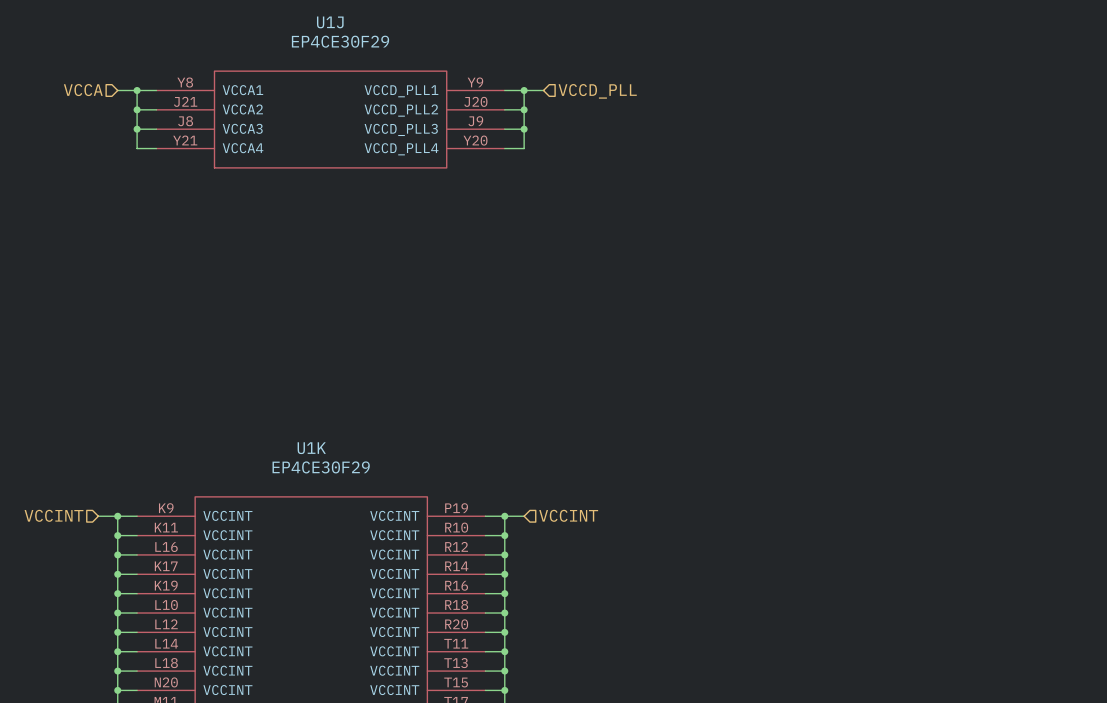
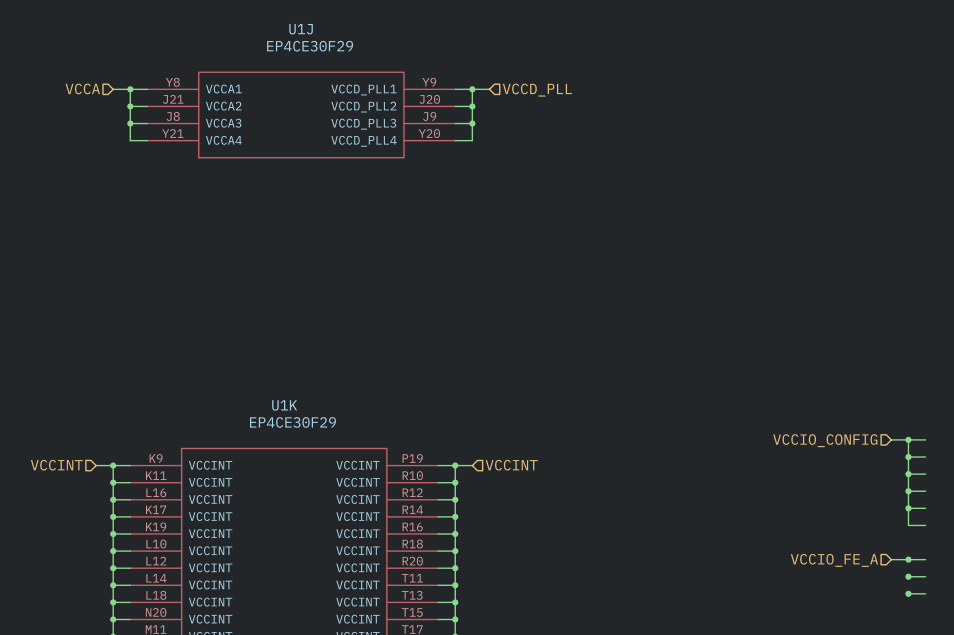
wire: none -> (891, 439) (925, 439)
wire: none -> (908, 439) (908, 525) (925, 525)
junction: none -> (908, 439)
hierarchical label: none -> VCCIO_CONFIG (825, 440)
wire: none -> (908, 457) (925, 457)
junction: none -> (908, 457)
wire: none -> (908, 474) (925, 474)
junction: none -> (908, 474)
wire: none -> (908, 491) (925, 491)
junction: none -> (908, 491)
wire: none -> (908, 508) (925, 508)
junction: none -> (908, 508)
wire: none -> (891, 559) (925, 559)
junction: none -> (908, 559)
hierarchical label: none -> VCCIO_FE_A (834, 560)
wire: none -> (908, 576) (925, 576)
junction: none -> (908, 576)
wire: none -> (908, 593) (925, 593)
junction: none -> (908, 593)

